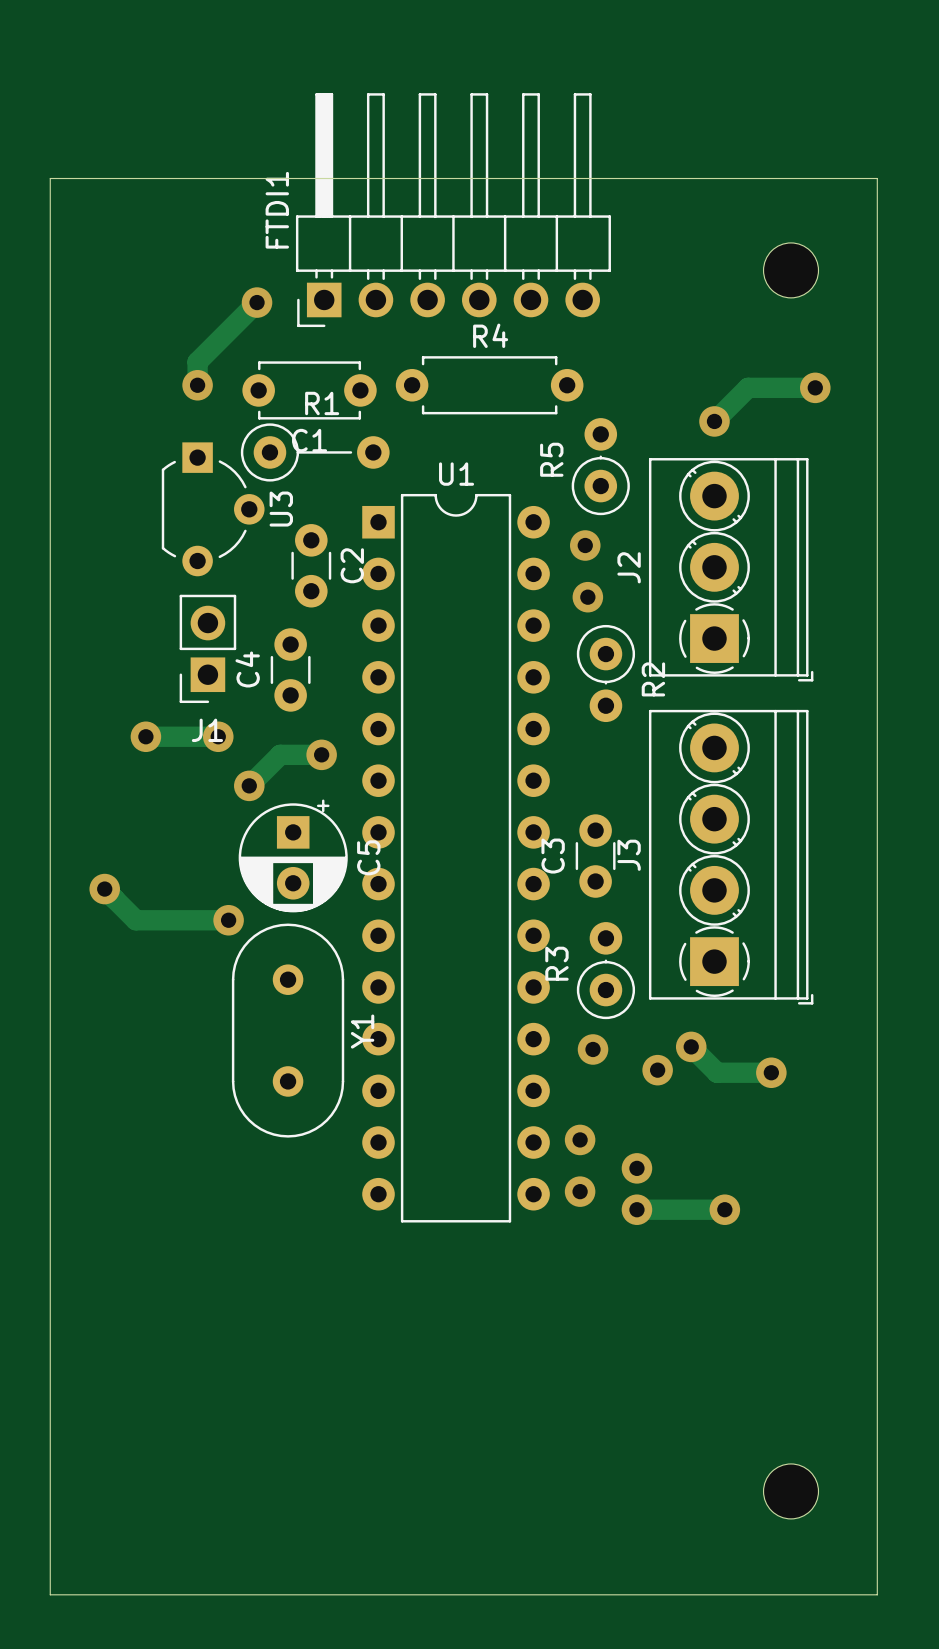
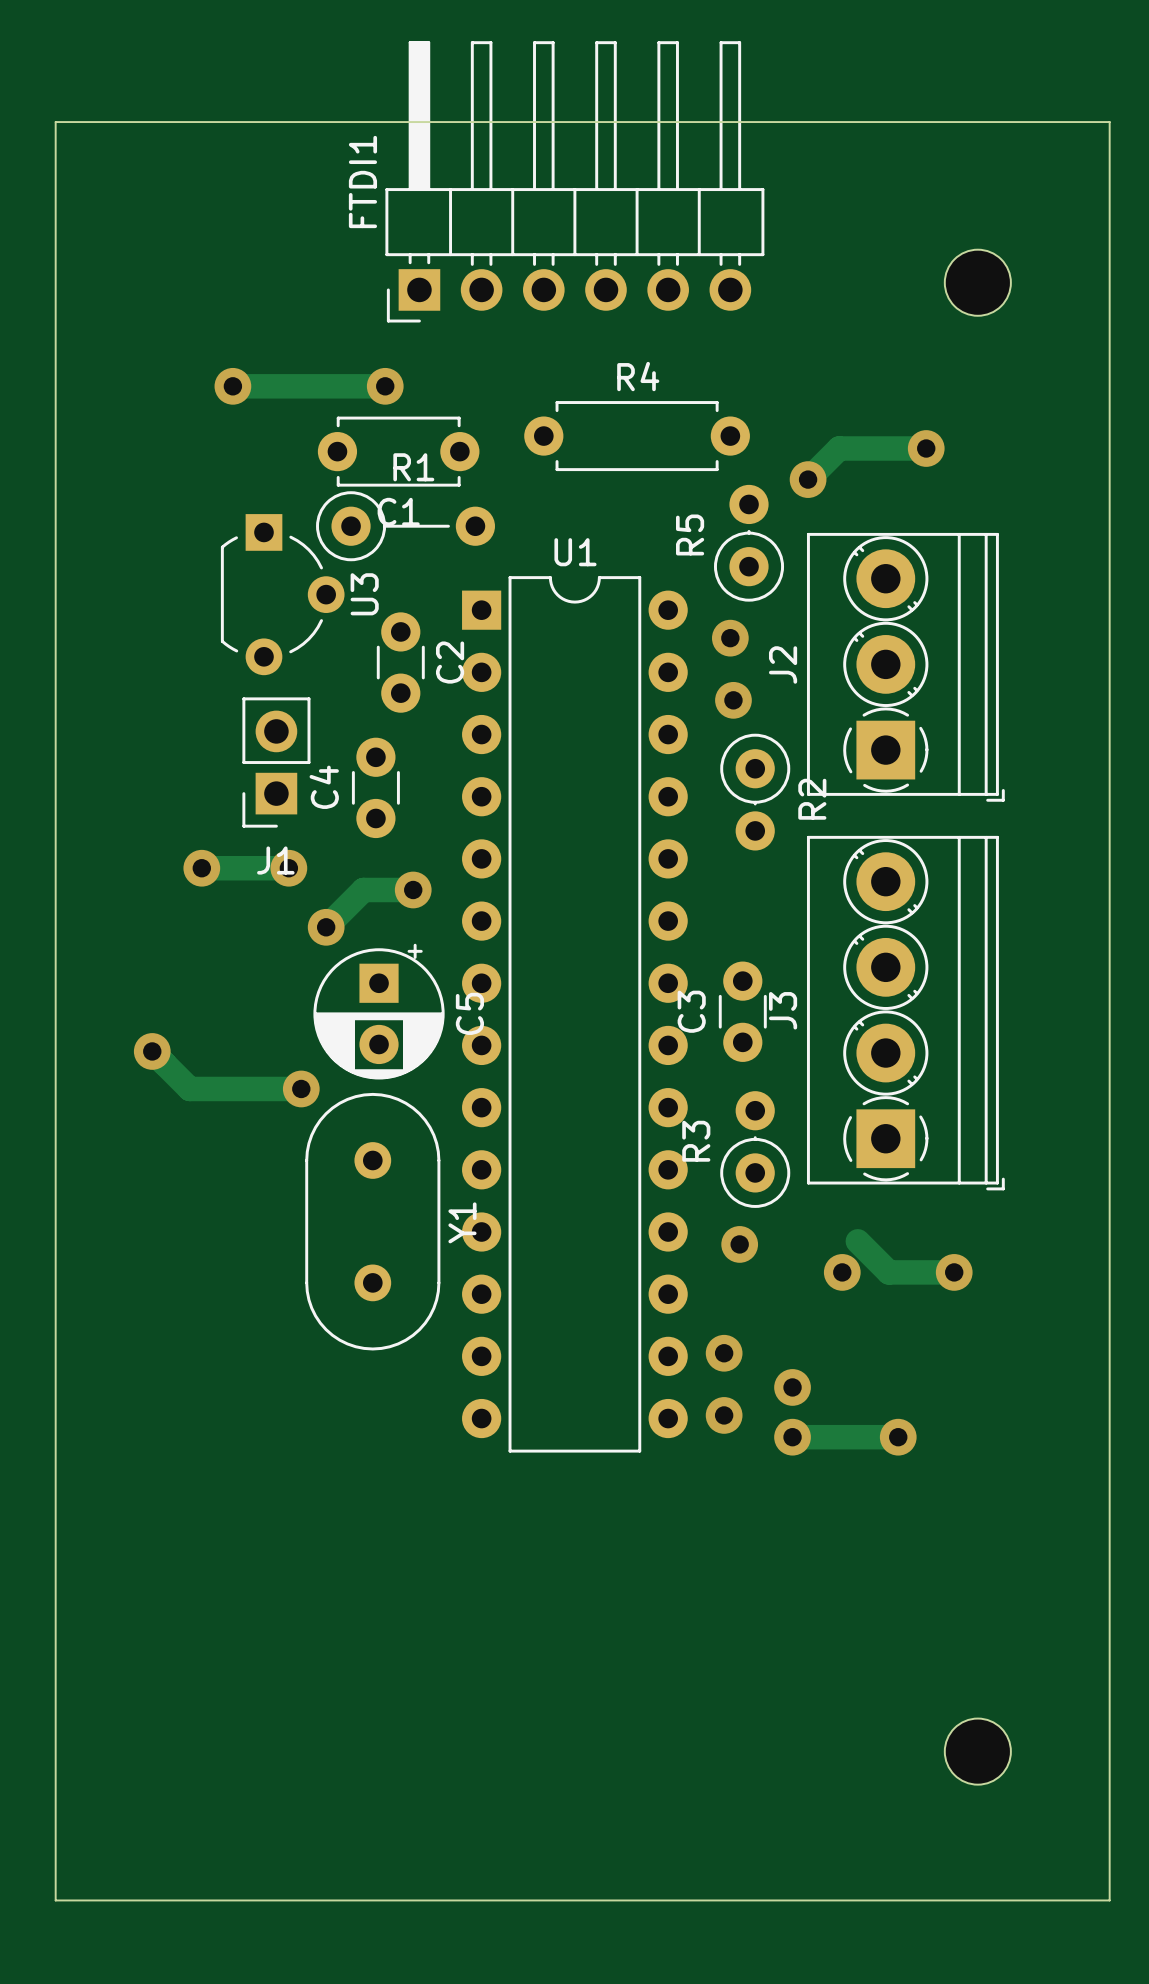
FTDI1 position: (453, 210) -> (574, 181)
part position: (791, 270) -> (977, 282)
track: (257, 302) (197, 362) (197, 385) -> none
via: (257, 302) -> none
track: none -> (232, 386) (385, 386)
via: none -> (232, 386)
via: none -> (385, 386)
via: (197, 385) -> none
R4 position: (489, 385) -> (637, 436)
track: none -> (926, 448) (839, 448) (808, 479)
via: none -> (926, 448)
track: (815, 387) (748, 387) (714, 421) -> none
via: (815, 387) -> none
via: none -> (808, 479)
via: (714, 421) -> none
via: (691, 1046) -> none
via: (657, 1070) -> none
via: none -> (842, 1272)
part position: (791, 1491) -> (977, 1751)
board edge: (50, 1594) (50, 178) (877, 178) (877, 1594) -> (86, 1900) (55, 1900) (55, 122) (1109, 122) (1109, 1900) (1081, 1900)

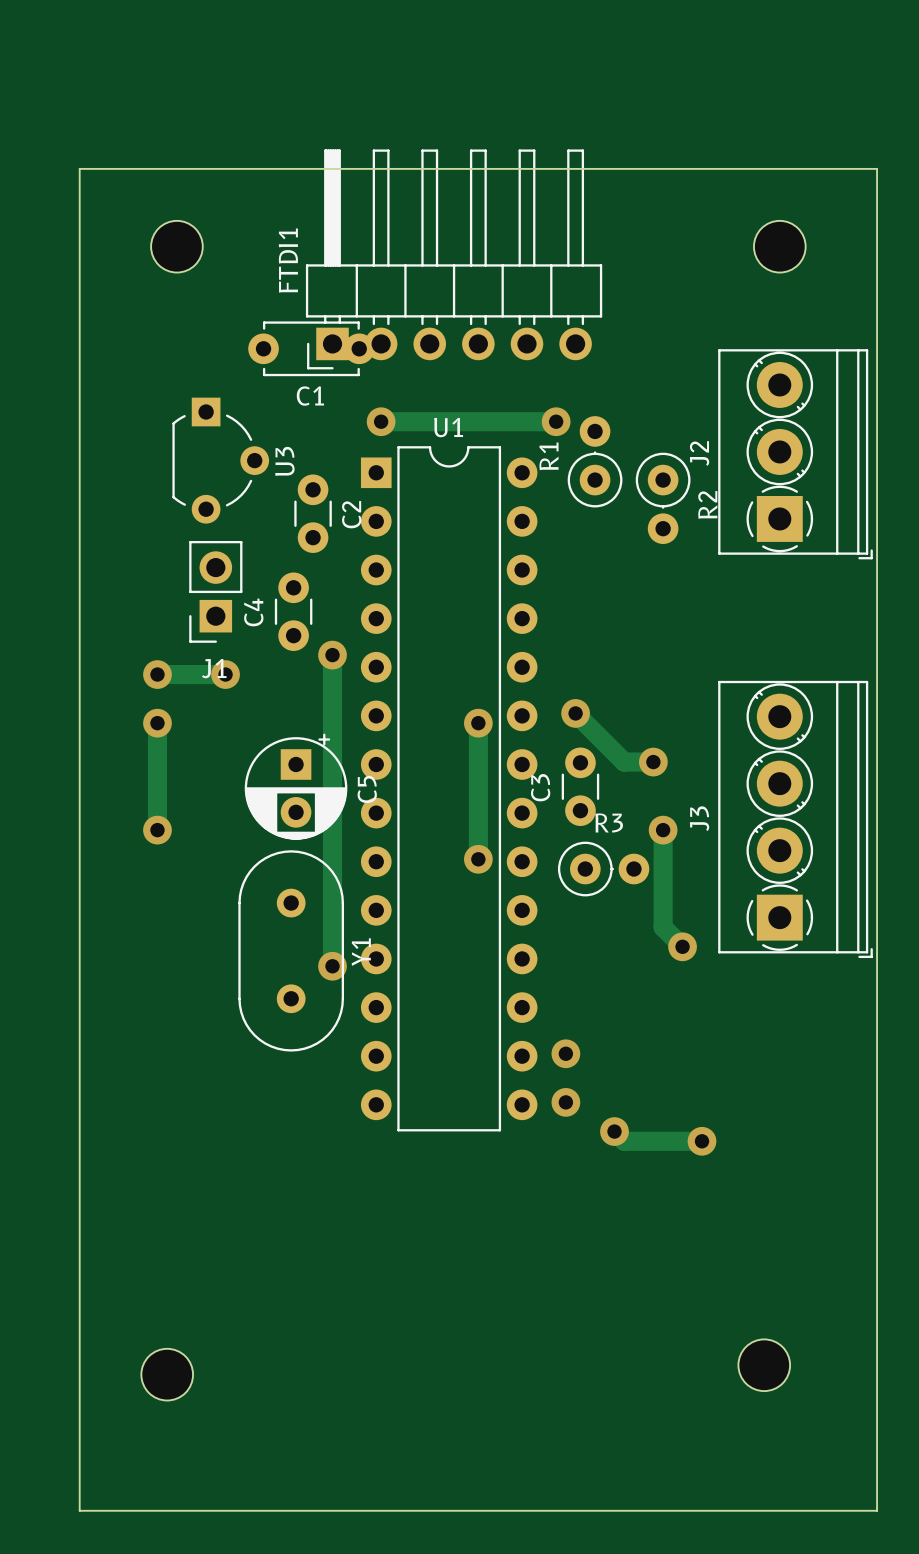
board edge: (55, 122) (55, 1900) (1109, 1900) (1109, 122) (55, 122) -> (79, 168) (79, 1510) (877, 1510) (877, 168) (79, 168)
FTDI1 position: (574, 181) -> (454, 259)
part position: (977, 282) -> (779, 246)
part: none -> (176, 246)
track: (232, 386) (385, 386) -> none
via: (232, 386) -> none
via: (385, 386) -> none
R4: (637, 436) -> none
track: (926, 448) (839, 448) (808, 479) -> none
via: (926, 448) -> none
R1 name position: R1 (413, 467) -> R1 (548, 456)
via: (808, 479) -> none
R1 footprint: [316, 491, 495, 562] -> [567, 416, 623, 508]
R5: (749, 543) -> none
track: none -> (381, 421) (556, 421)
via: none -> (381, 421)
via: none -> (556, 421)
via: (730, 638) -> none
J2 position: (905, 667) -> (795, 454)
via: (733, 700) -> none
R2 position: (755, 792) -> (663, 498)
track: none -> (332, 655) (332, 966)
track: (413, 889) (363, 889) (326, 927) -> none
via position: (413, 889) -> (332, 655)
track: none -> (575, 713) (624, 762) (653, 762)
via: none -> (575, 713)
via: (326, 927) -> none
track: none -> (157, 723) (157, 830)
via: none -> (157, 723)
track: none -> (478, 723) (478, 859)
via: none -> (478, 723)
via: none -> (653, 762)
J3 position: (905, 1013) -> (795, 819)
track: (155, 1048) (152, 1051) (189, 1088) (301, 1088) -> none
via: (152, 1051) -> none
via: none -> (157, 830)
track: none -> (663, 830) (663, 927) (682, 946)
via: none -> (663, 830)
via: (301, 1088) -> none
via: none -> (478, 859)
R3 rotation: 0° (755, 1149) -> 90° clockwise (603, 869)
via: none -> (682, 946)
via: none -> (332, 966)
track: (857, 1241) (888, 1272) (954, 1272) -> none
via: (739, 1244) -> none
via: (842, 1272) -> none
via: (954, 1272) -> none
via: (792, 1387) -> none
track: (792, 1437) (898, 1437) -> none
via position: (792, 1437) -> (614, 1131)
via position: (898, 1437) -> (702, 1141)
track: none -> (614, 1131) (624, 1141) (702, 1141)
part: none -> (167, 1374)

